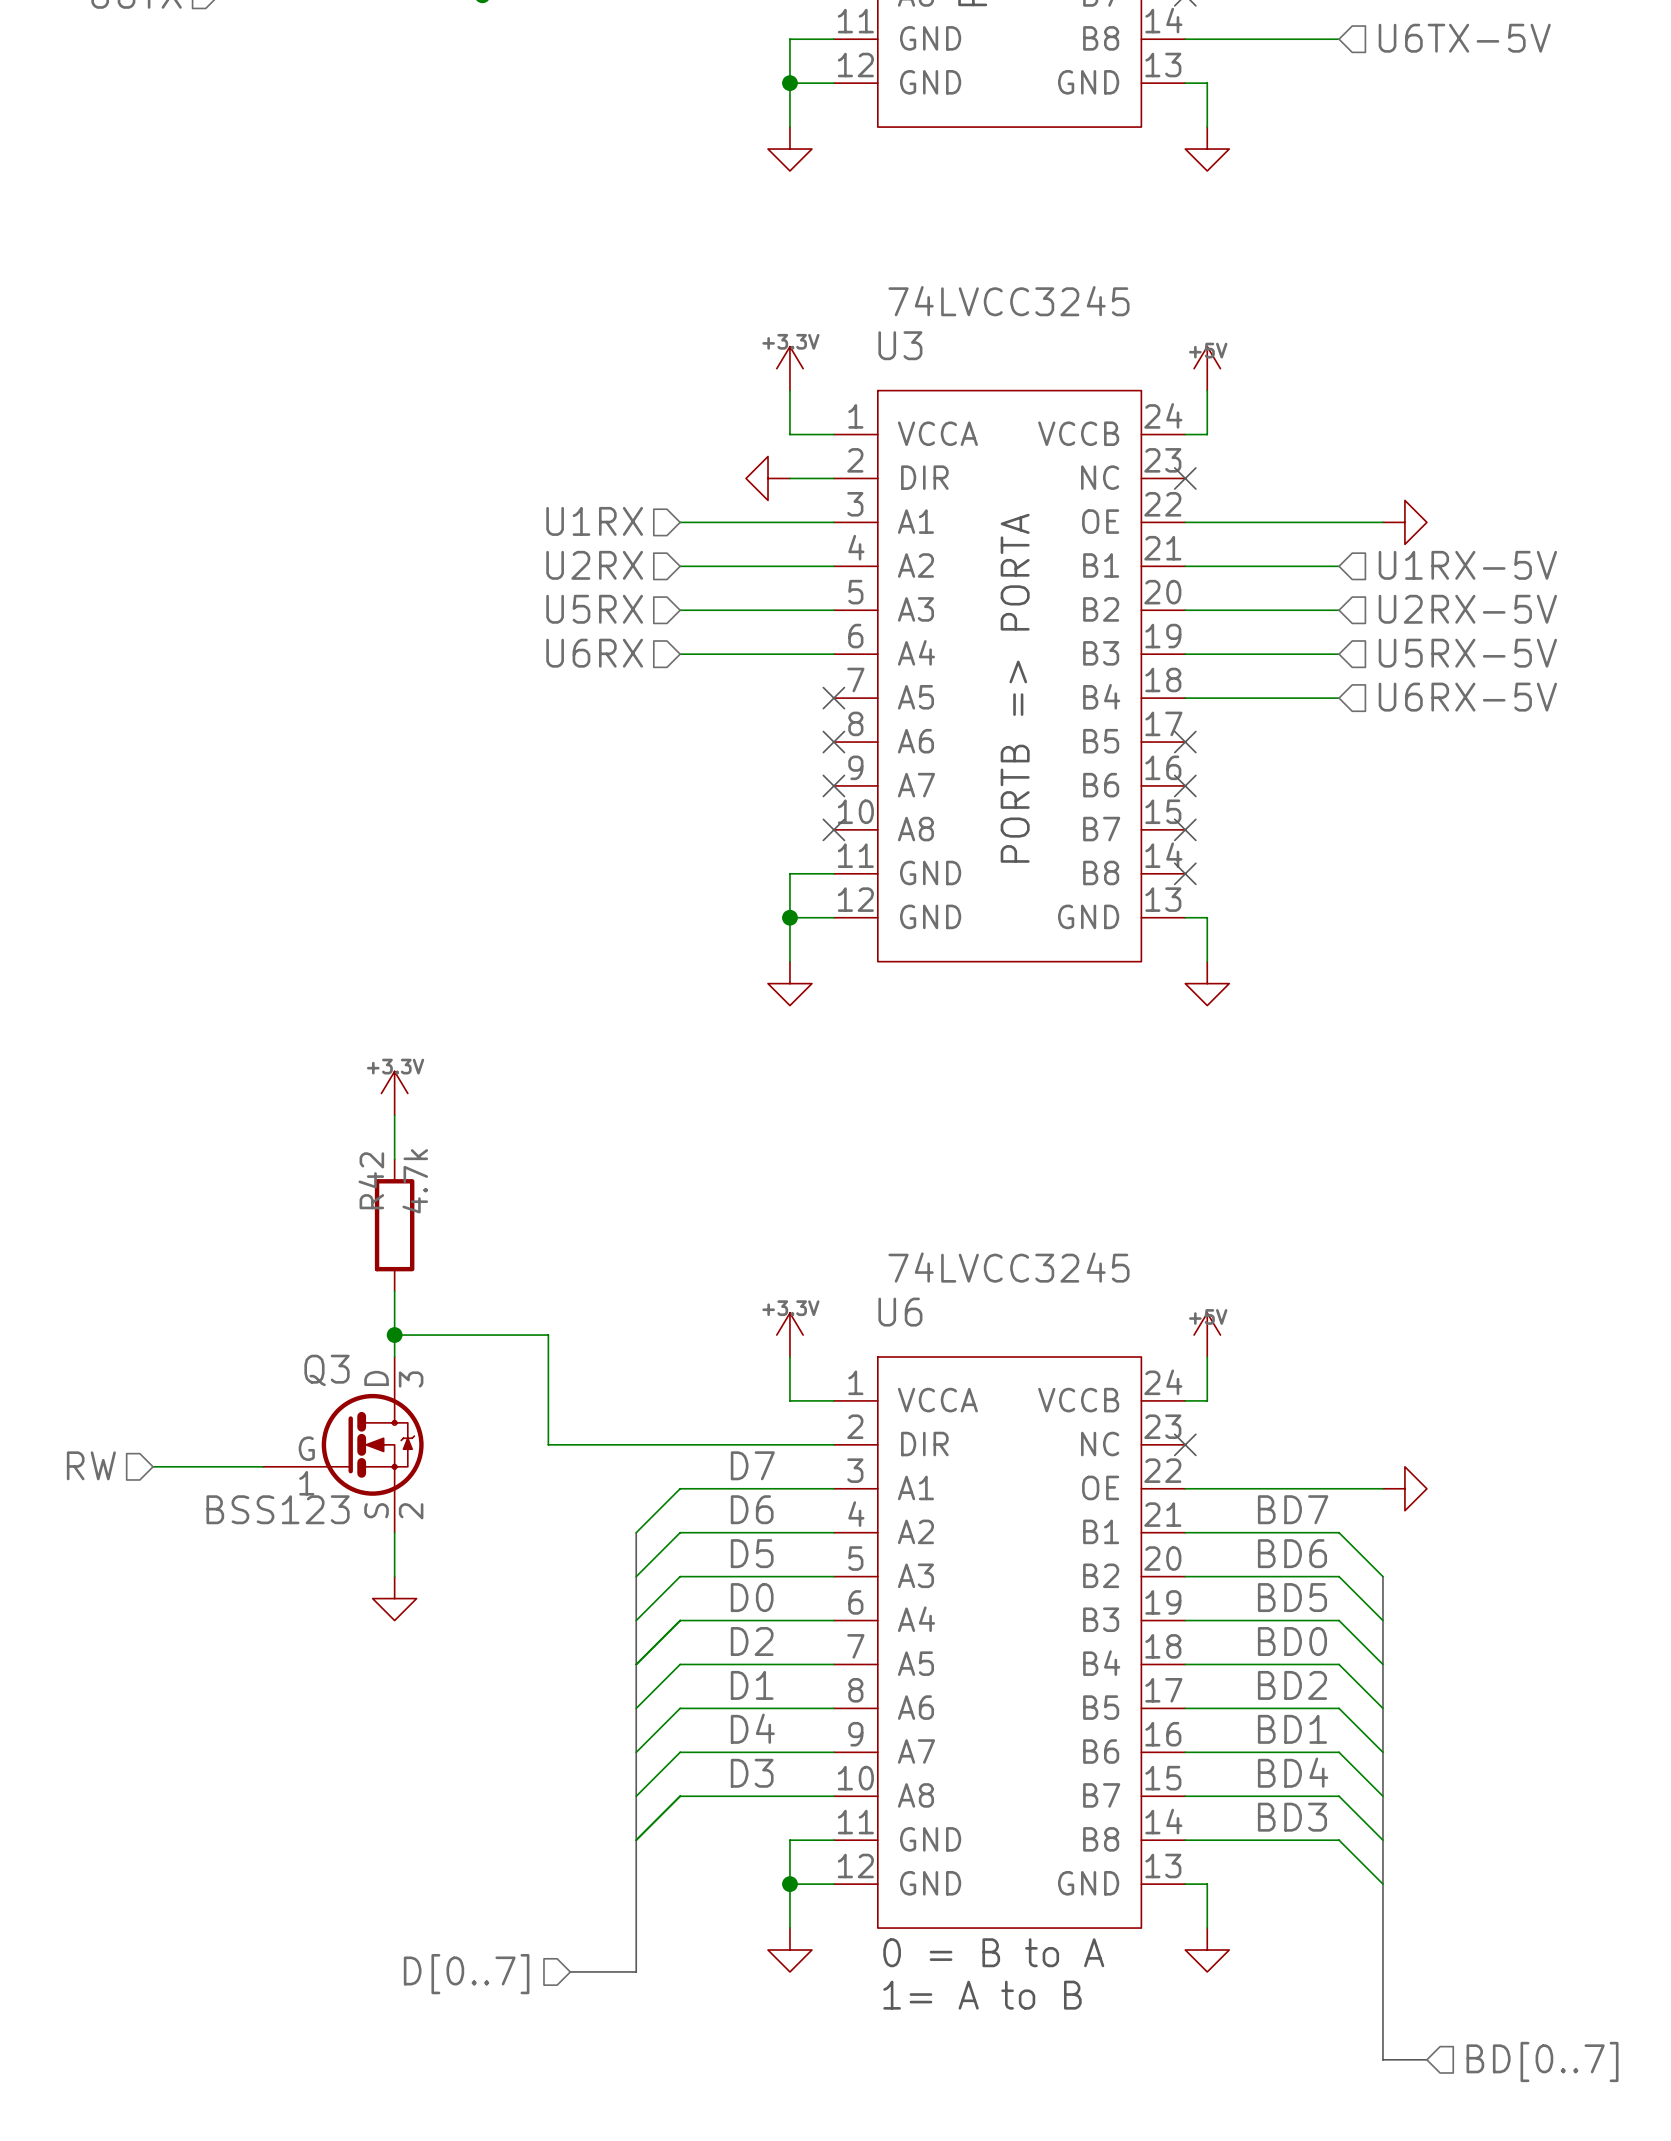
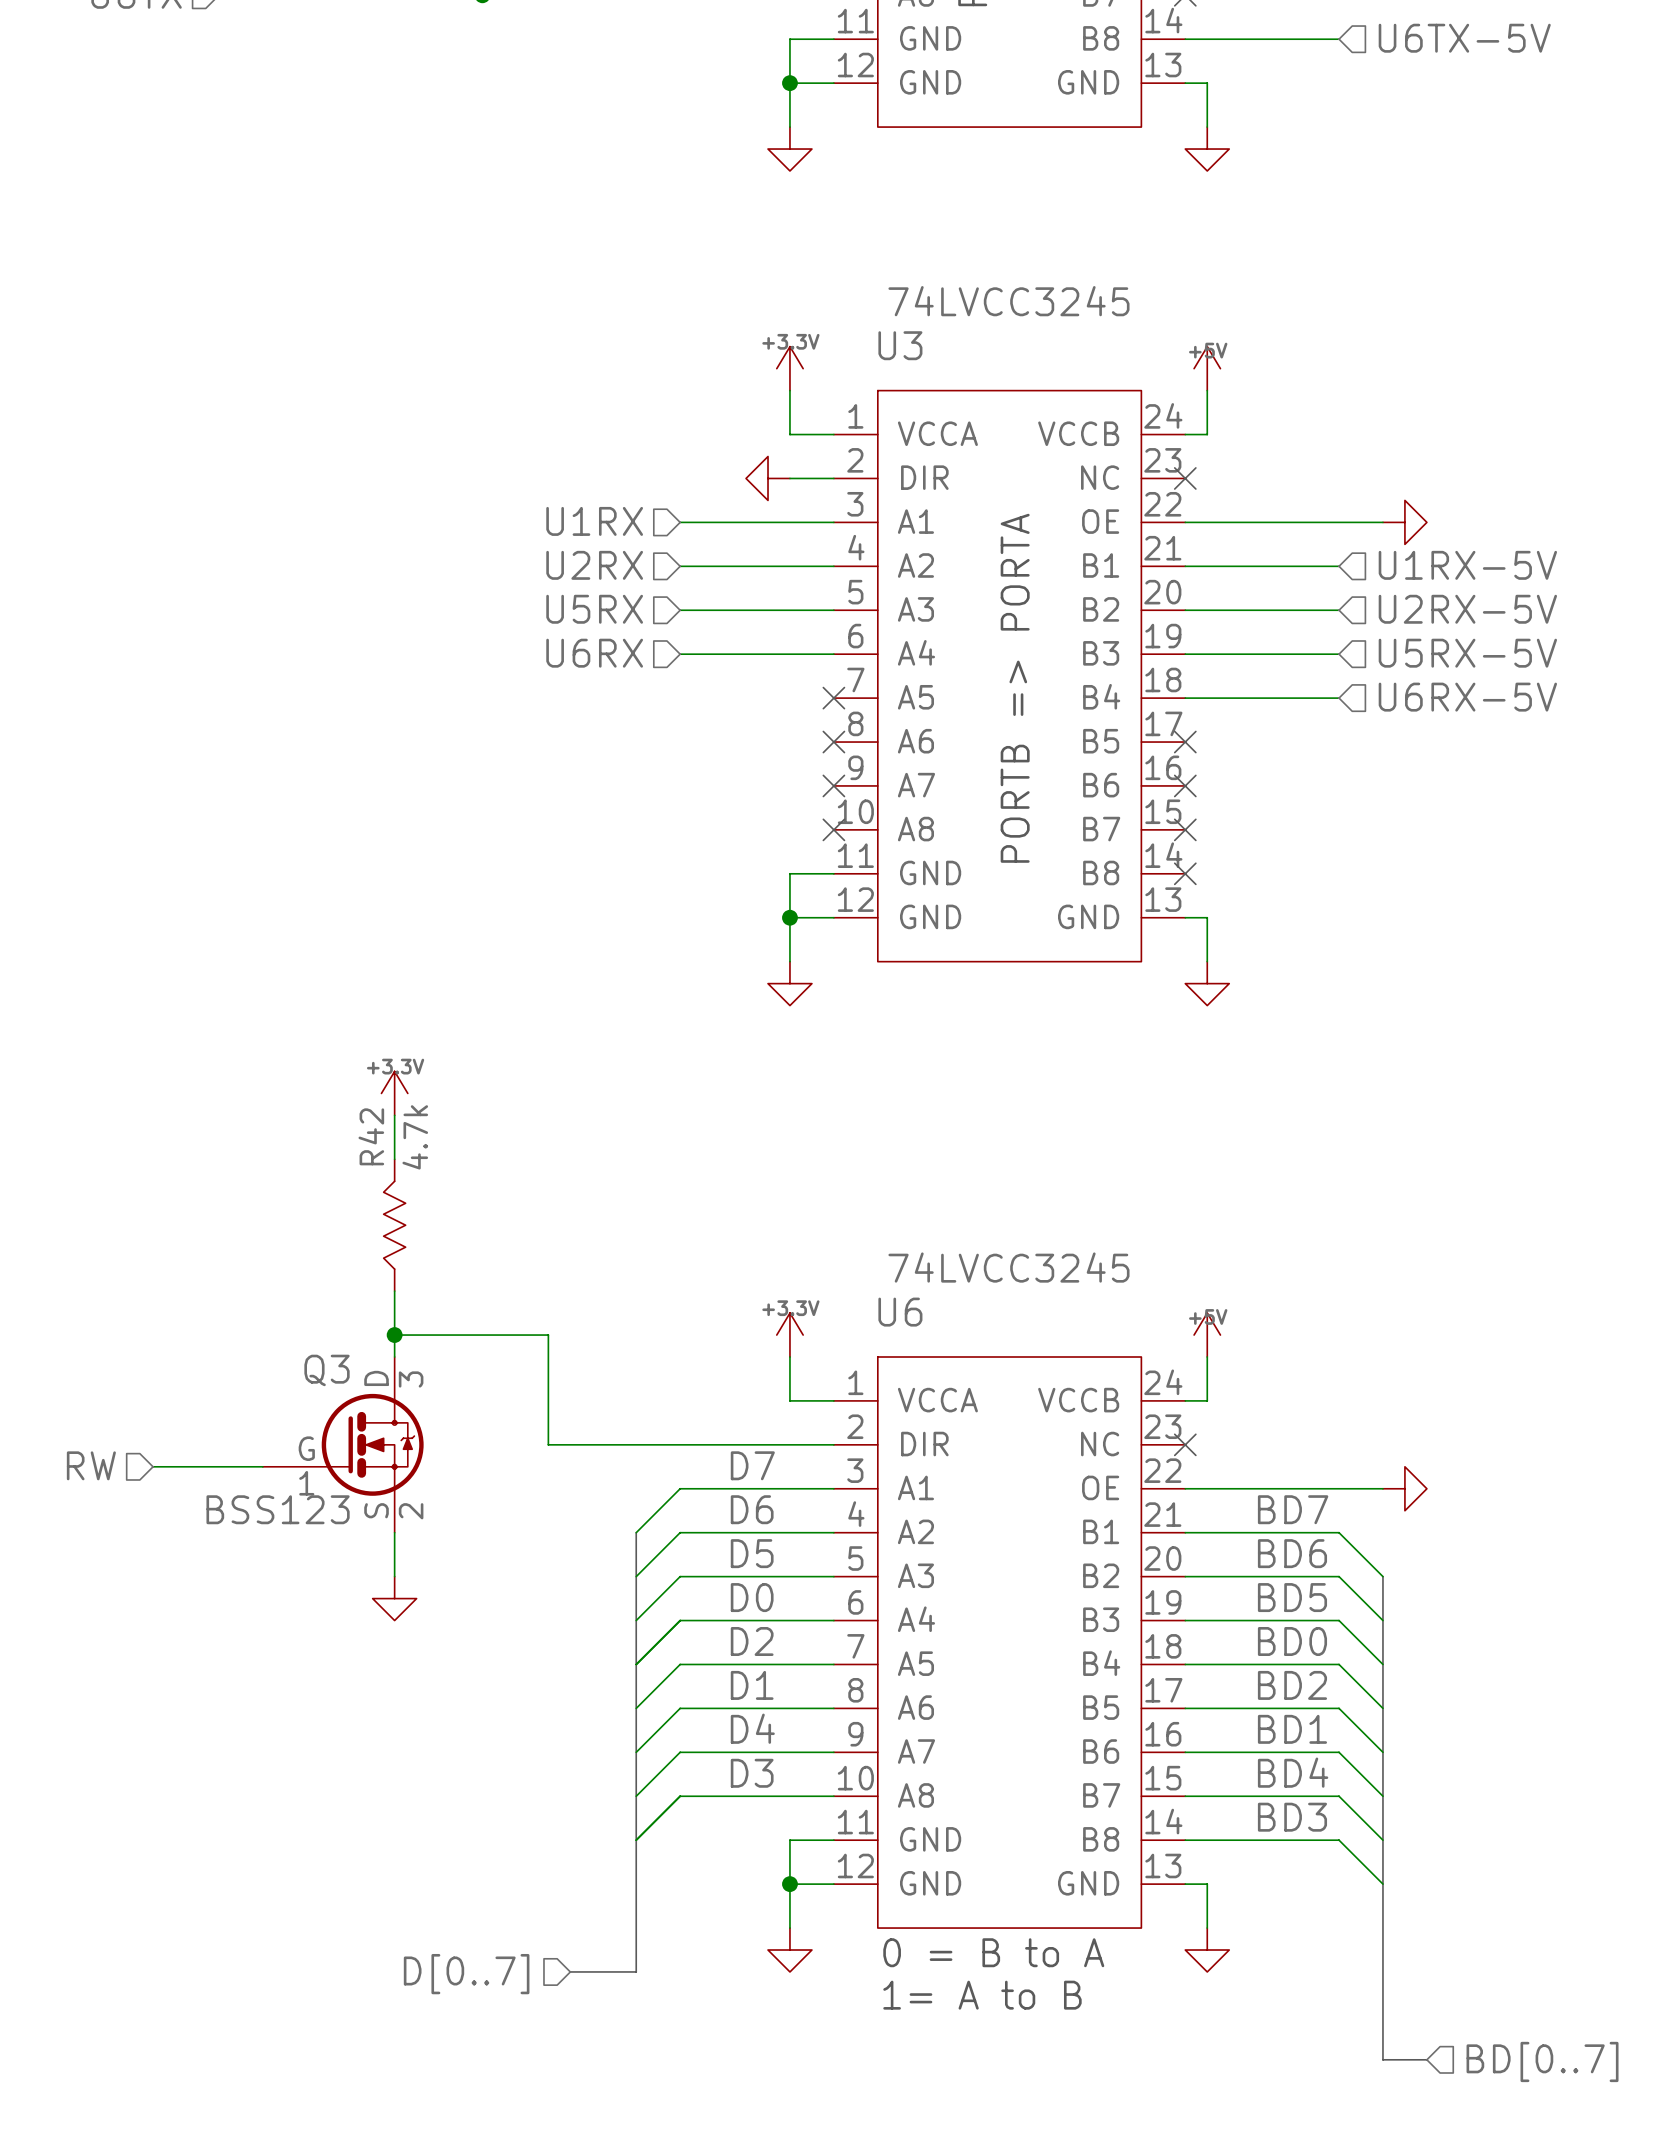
R42 symbol: [374, 1159, 415, 1292] -> [383, 1159, 406, 1292]
R42 name position: R42 (371, 1180) -> R42 (371, 1136)
R42 value position: 4.7k (415, 1181) -> 4.7k (415, 1137)

